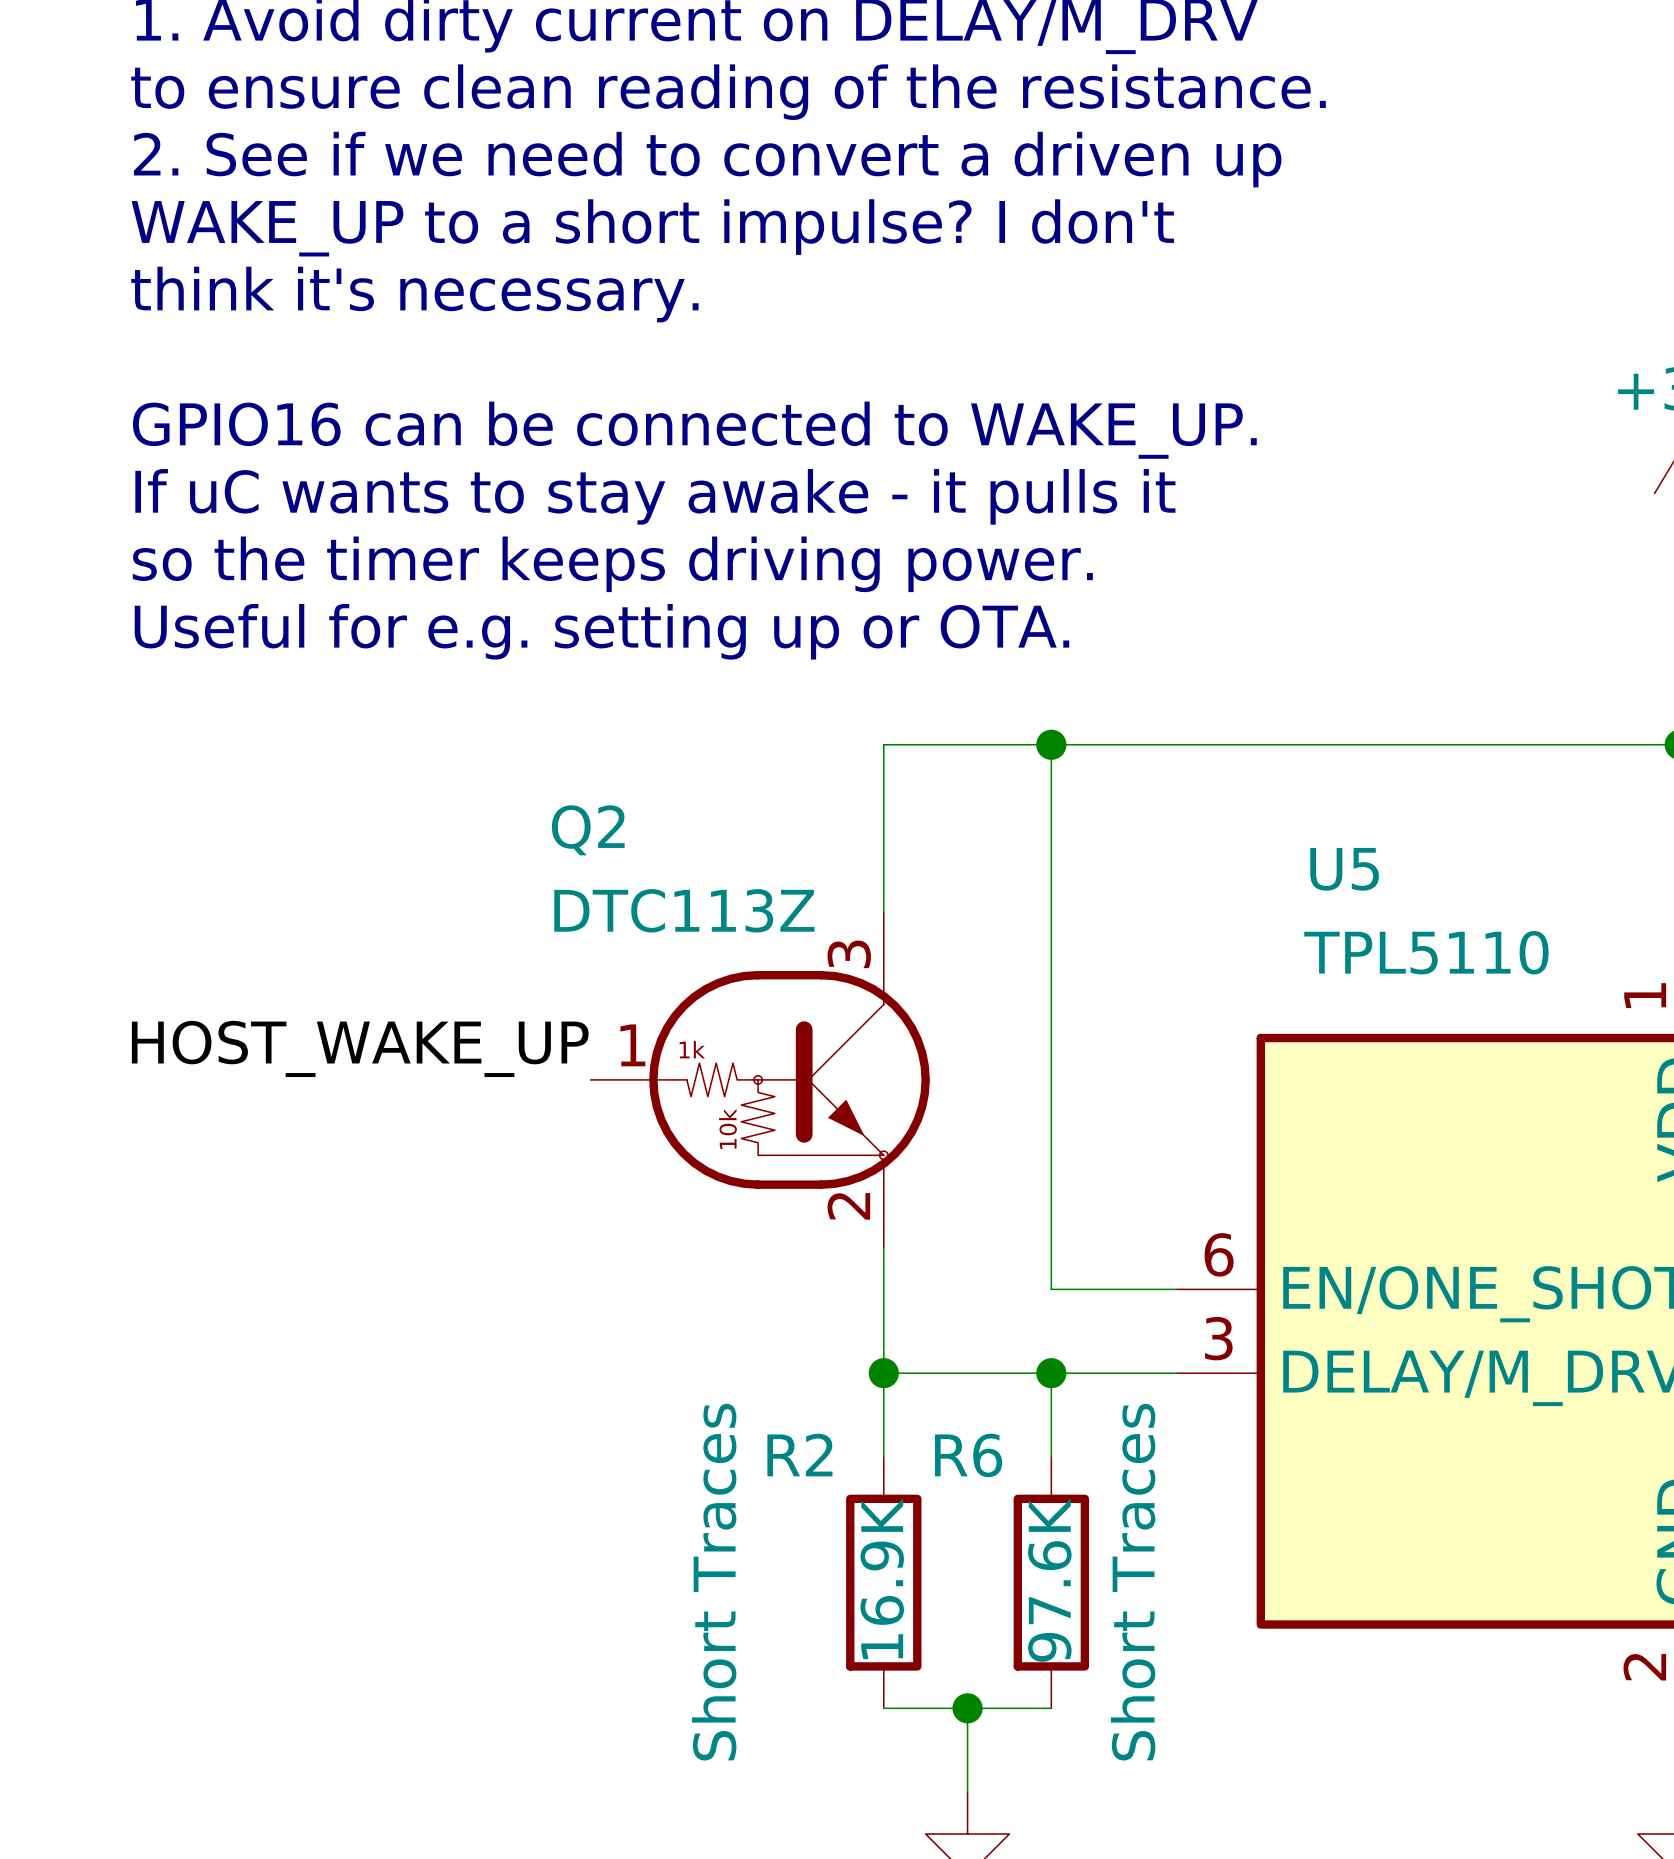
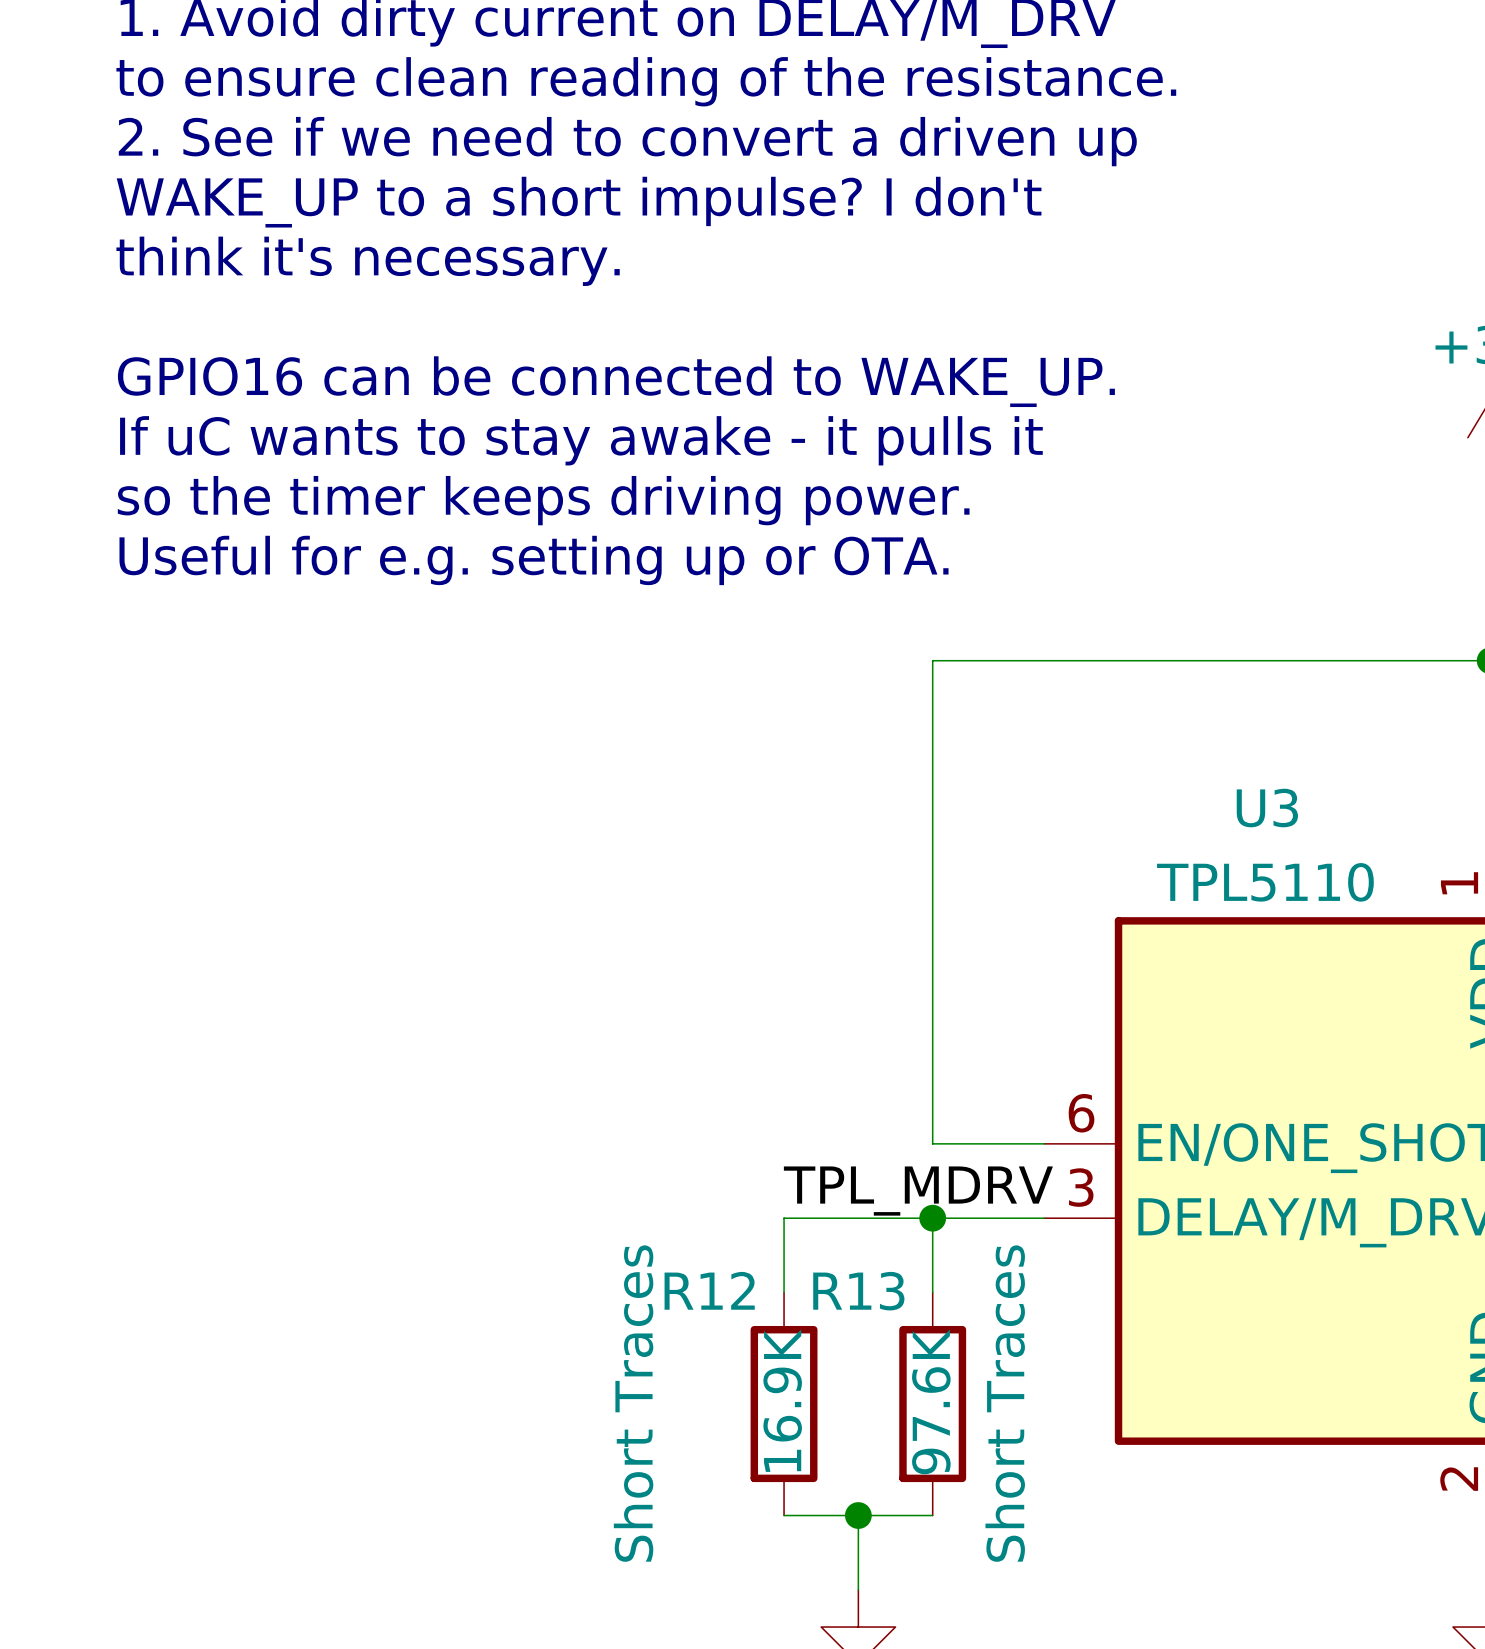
wire: (1051, 744) (883, 744) (883, 912) -> none
junction: (1051, 744) -> none
U5 name: U5 (1344, 869) -> U3 (1267, 808)
U5 value position: TPL5110 (1426, 952) -> TPL5110 (1265, 882)
label: HOST_WAKE_UP (360, 1048) -> none
Q2: DTC113Z (760, 1079) -> none
wire: (883, 1247) (883, 1373) -> none
label: none -> TPL_MDRV (918, 1191)
junction: (883, 1373) -> none
R2 name: R2 (799, 1455) -> R12 (709, 1290)
R6 name: R6 (968, 1455) -> R13 (858, 1291)

